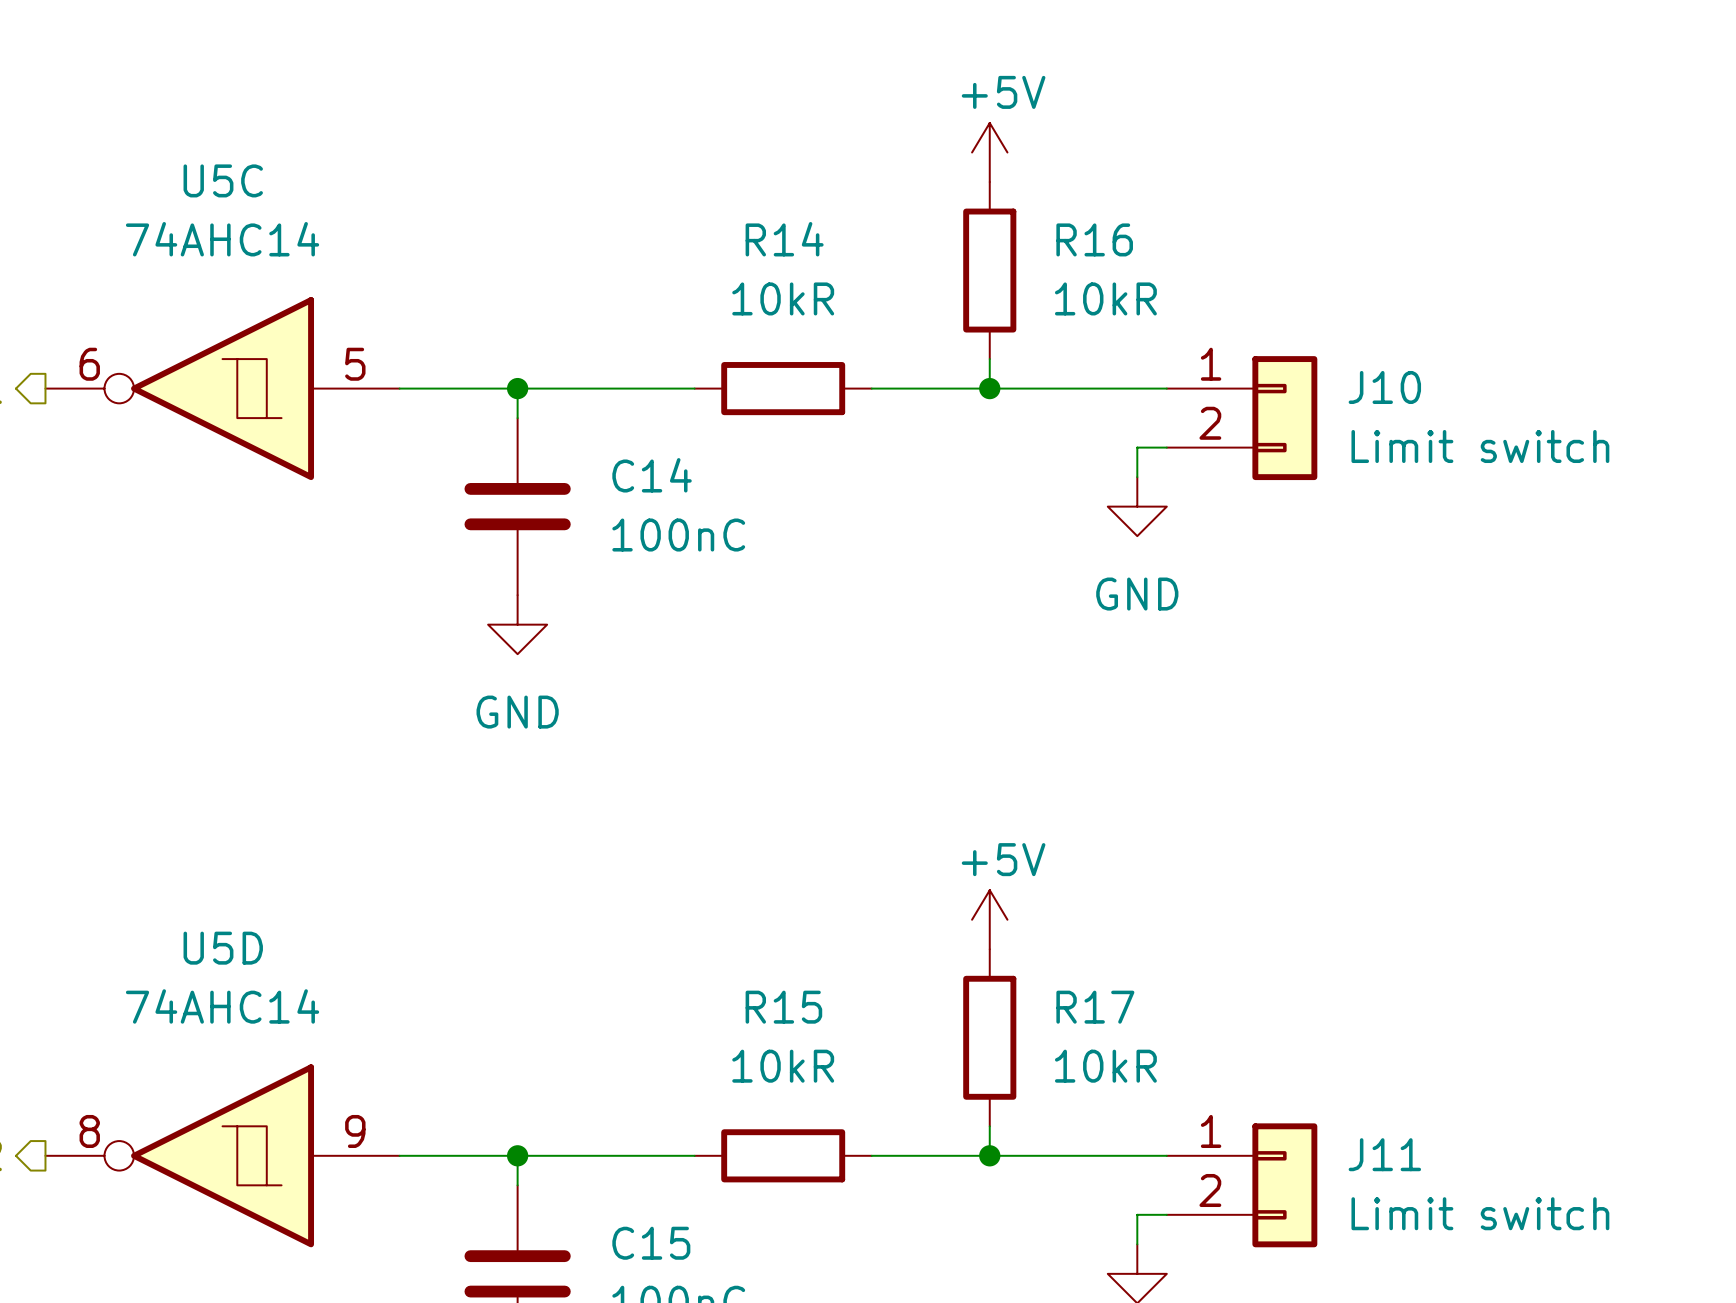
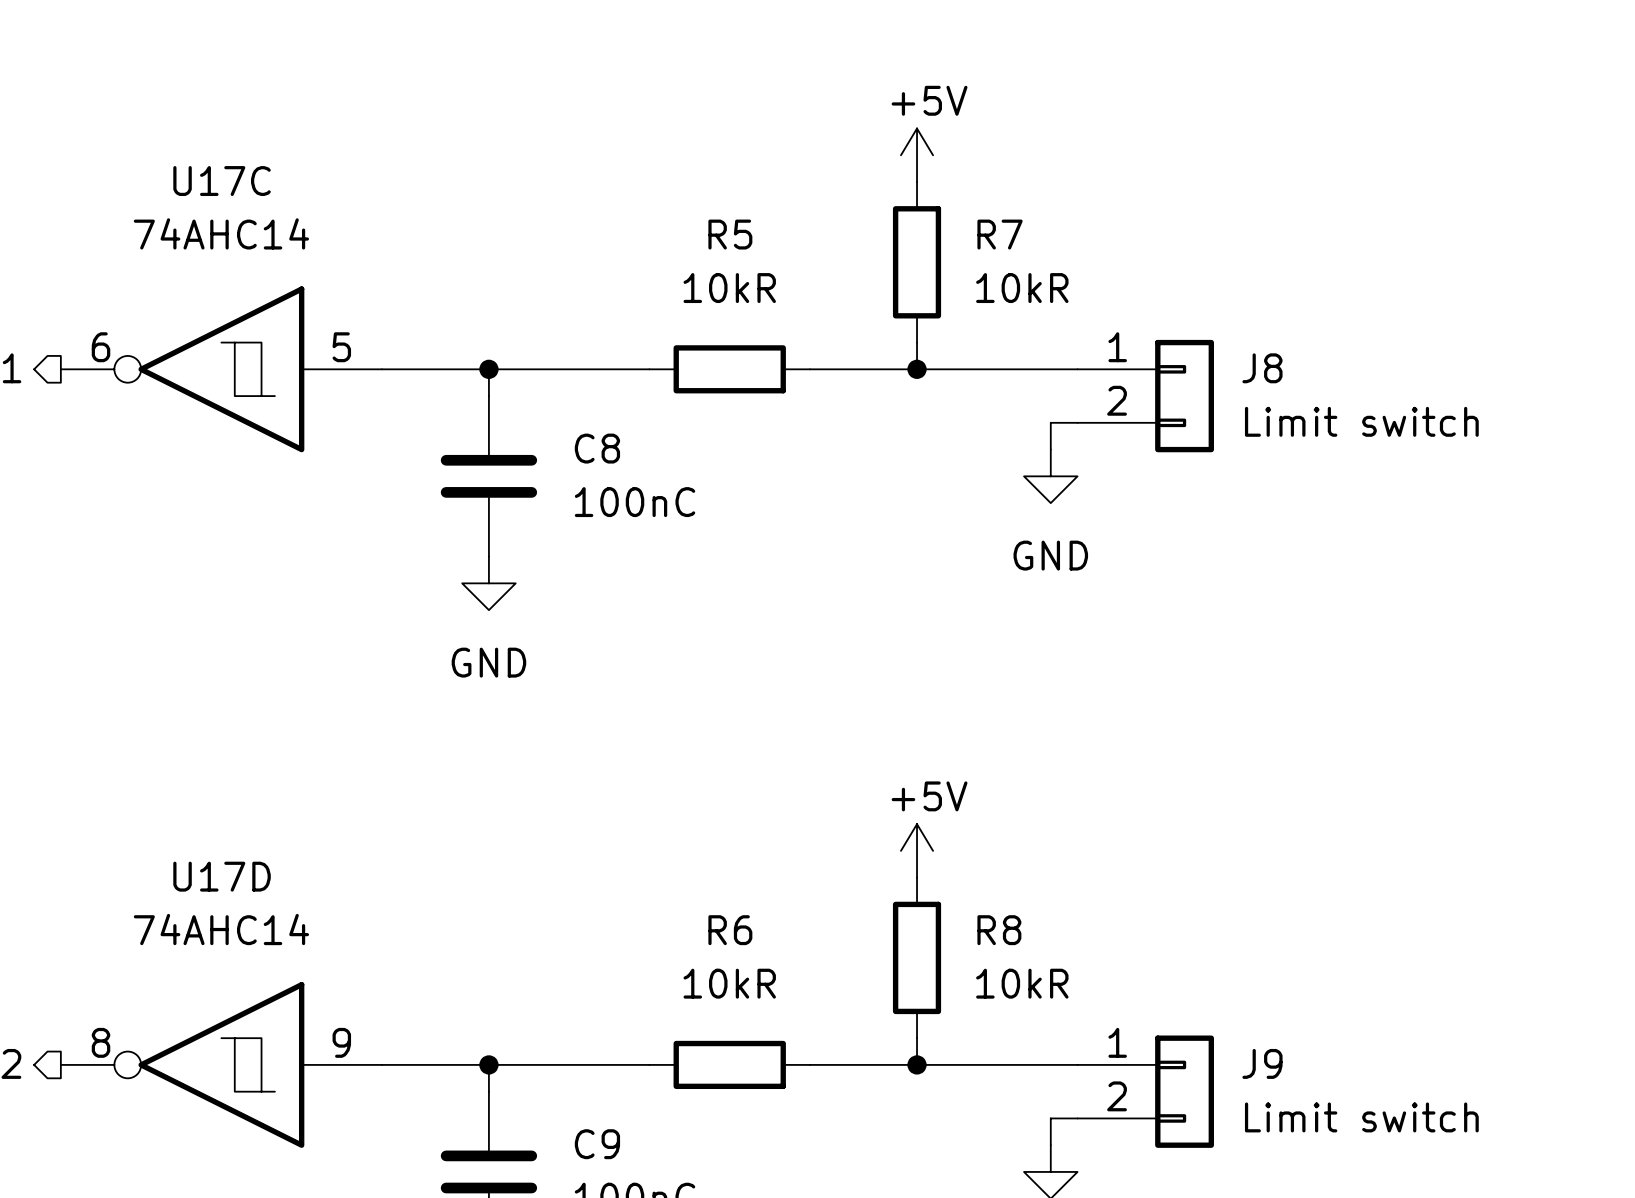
U5C name: U5C (223, 180) -> U17C (222, 181)
R14 name: R14 (784, 239) -> R5 (730, 234)
R16 name: R16 (1094, 239) -> R7 (1000, 234)
J10 name: J10 (1384, 387) -> J8 (1262, 368)
C14 name: C14 (652, 475) -> C8 (597, 448)
U5D name: U5D (223, 948) -> U17D (222, 876)
R15 name: R15 (783, 1007) -> R6 (730, 930)
R17 name: R17 (1095, 1007) -> R8 (999, 930)
J11 name: J11 (1384, 1154) -> J9 (1262, 1063)
C15 name: C15 (651, 1243) -> C9 (597, 1144)

